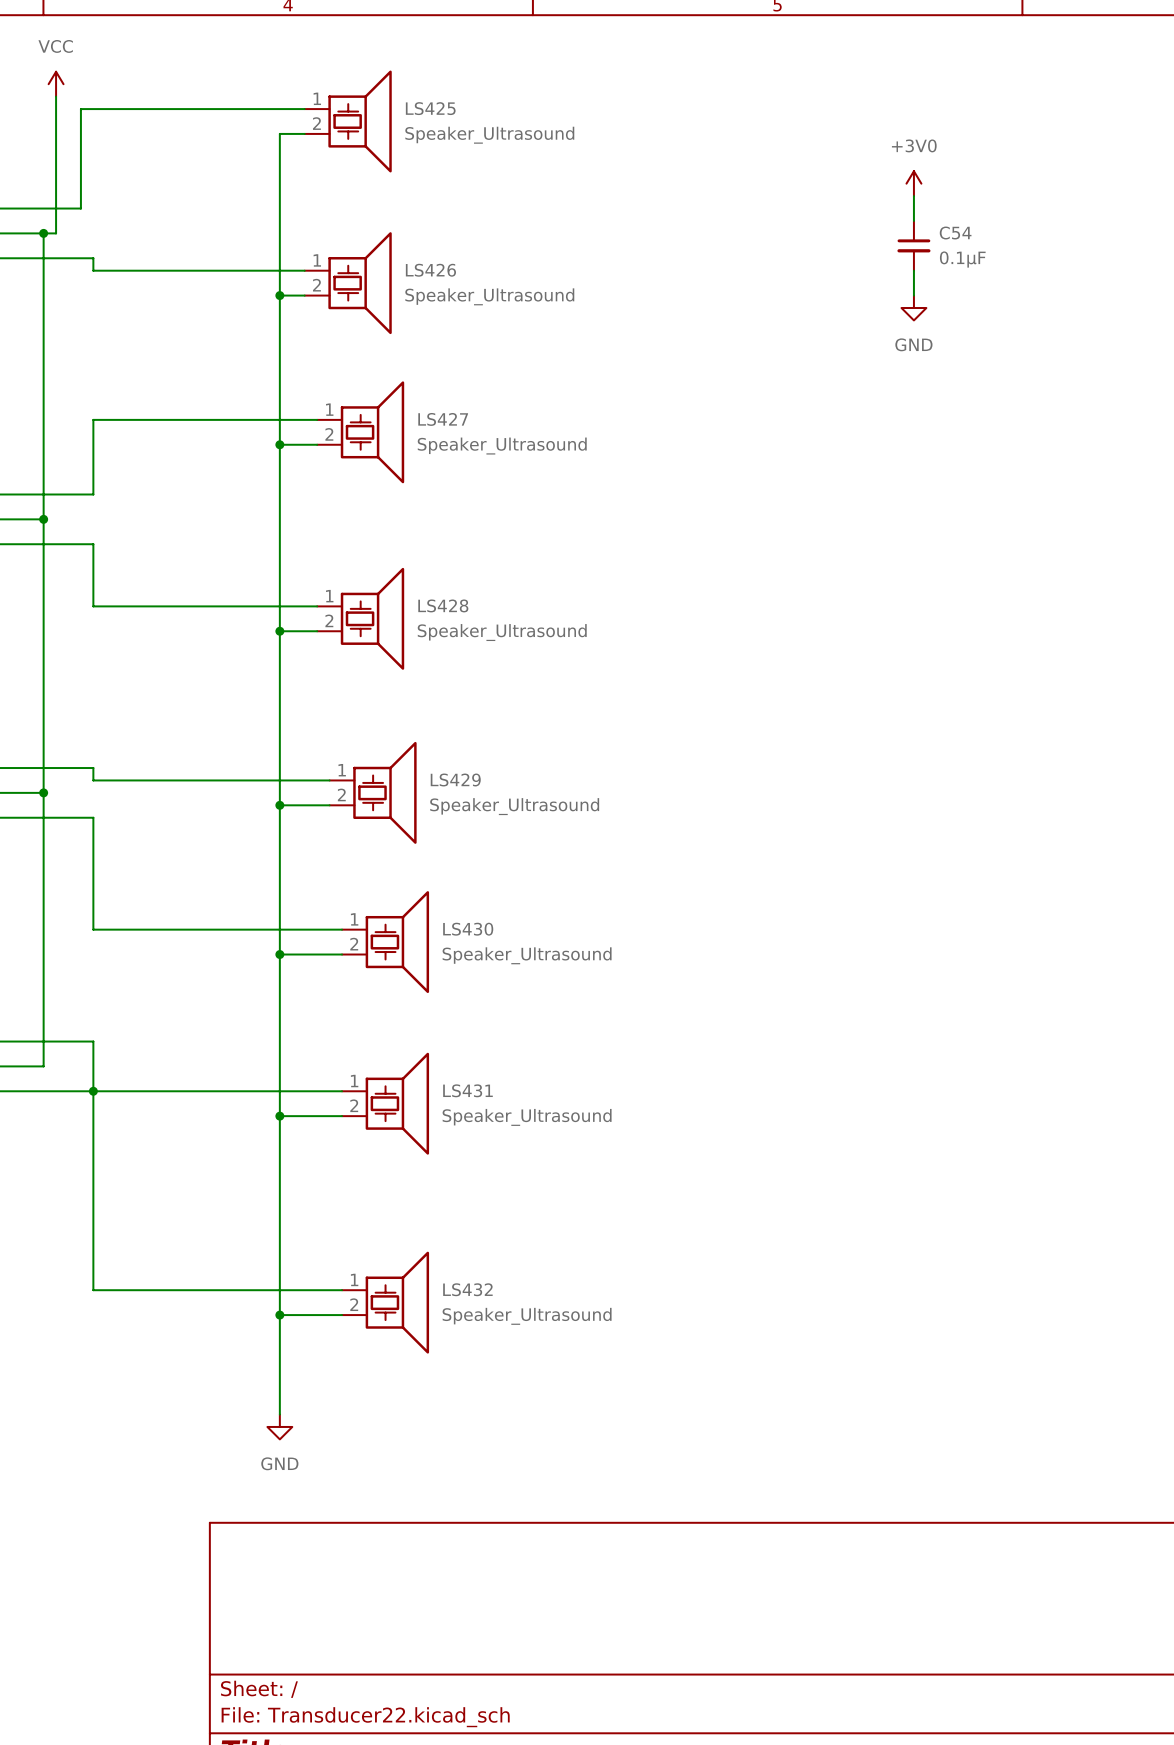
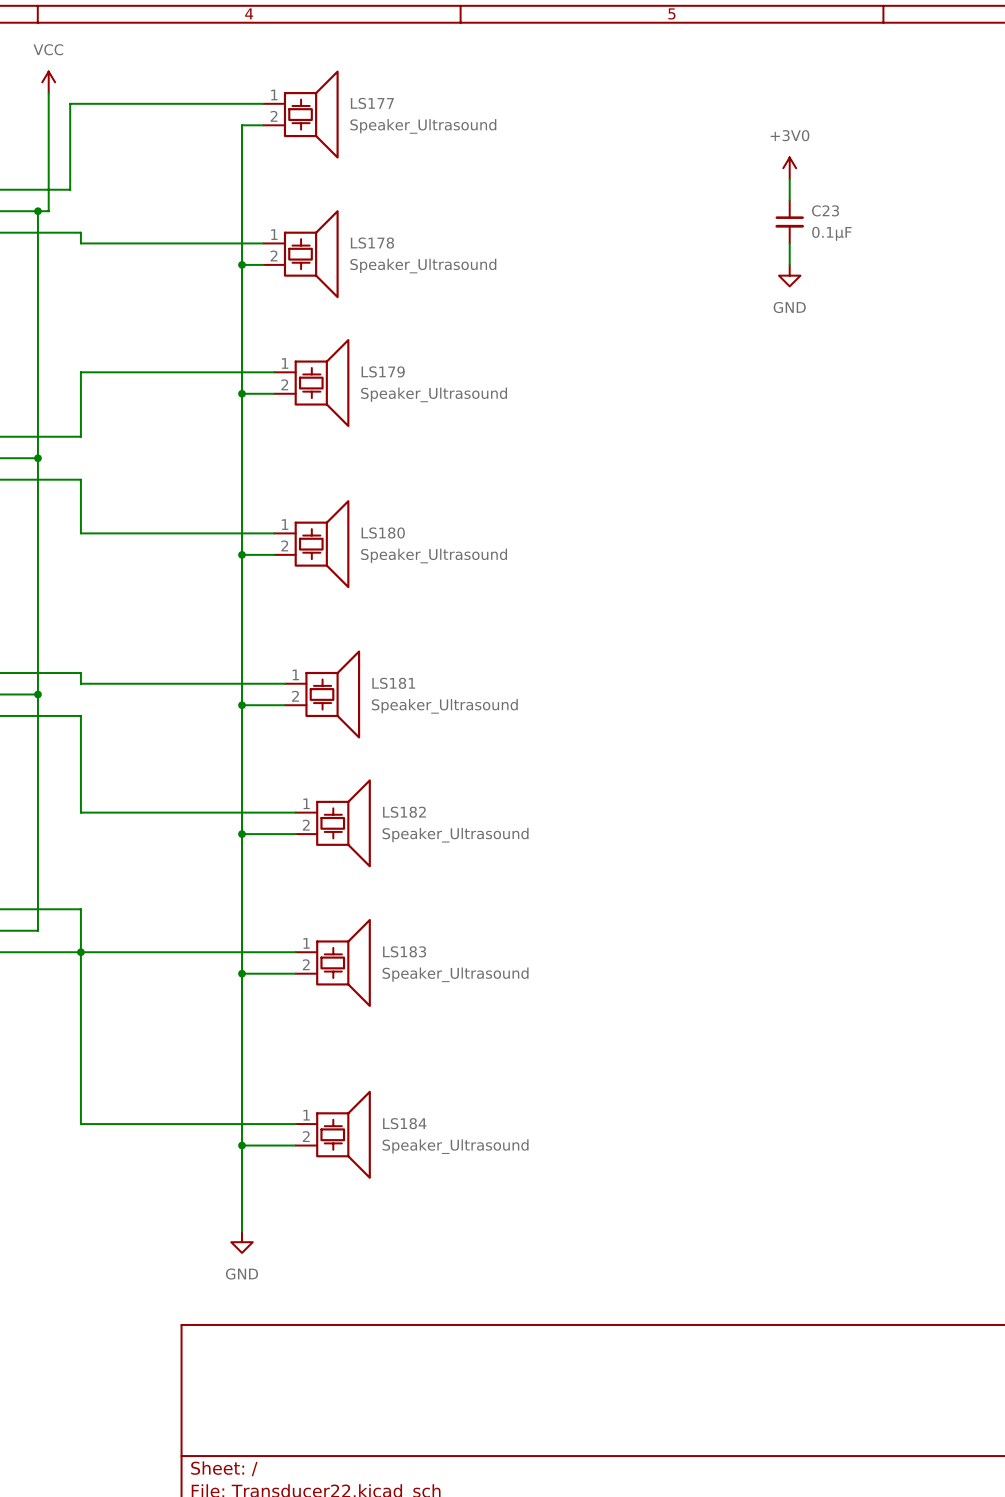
LS425 name: LS425 (430, 108) -> LS177 (372, 103)
C54 name: C54 (955, 233) -> C23 (825, 210)
LS426 name: LS426 (430, 270) -> LS178 (372, 243)
LS427 name: LS427 (443, 419) -> LS179 (383, 371)
LS428 name: LS428 (443, 605) -> LS180 (383, 533)
LS429 name: LS429 (455, 779) -> LS181 (393, 683)
LS430 name: LS430 (468, 929) -> LS182 (404, 812)
LS431 name: LS431 (467, 1090) -> LS183 (404, 951)
LS432 name: LS432 (467, 1289) -> LS184 (404, 1123)

